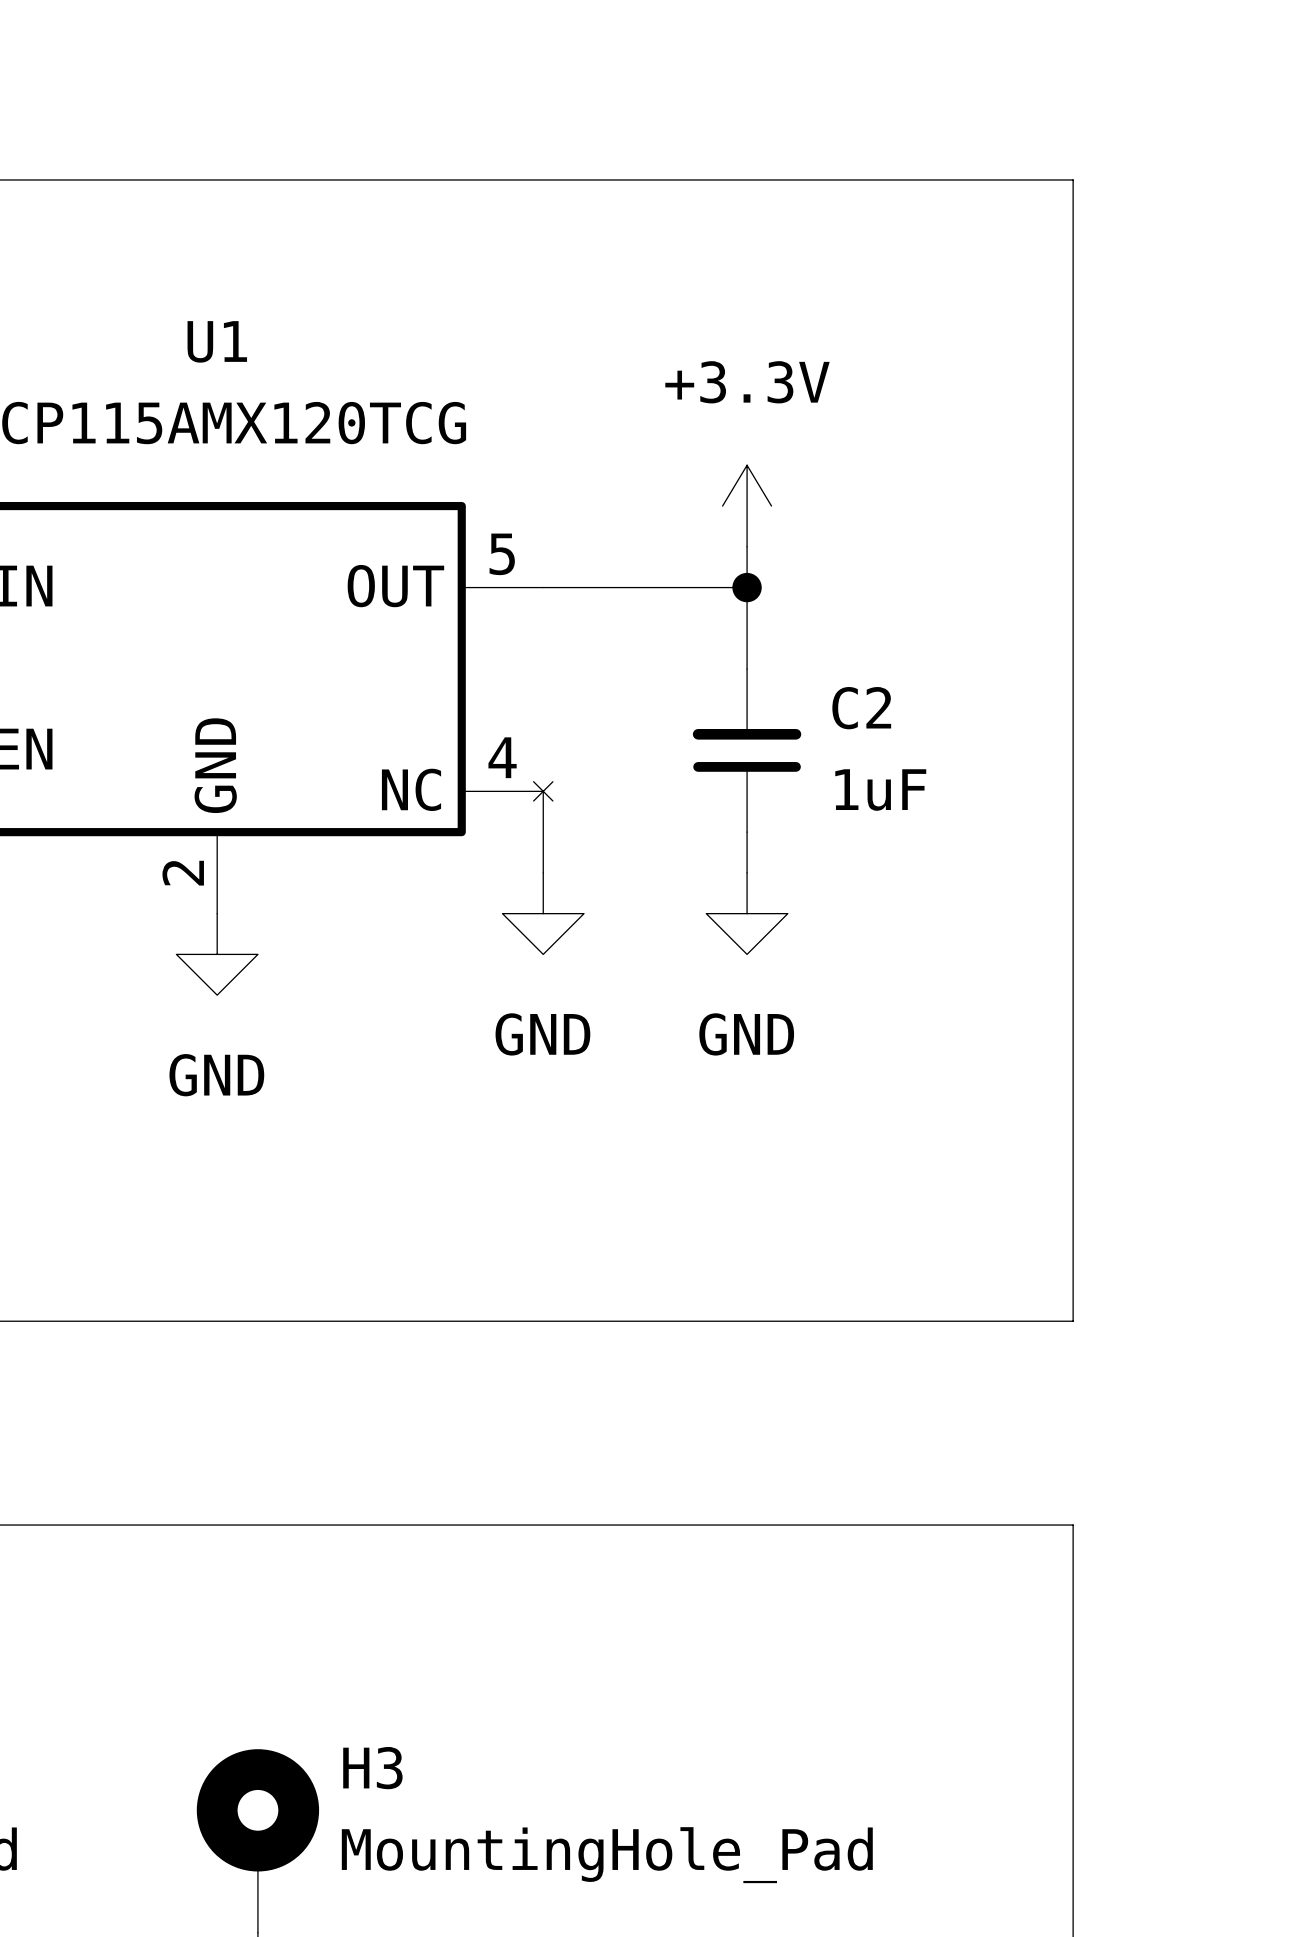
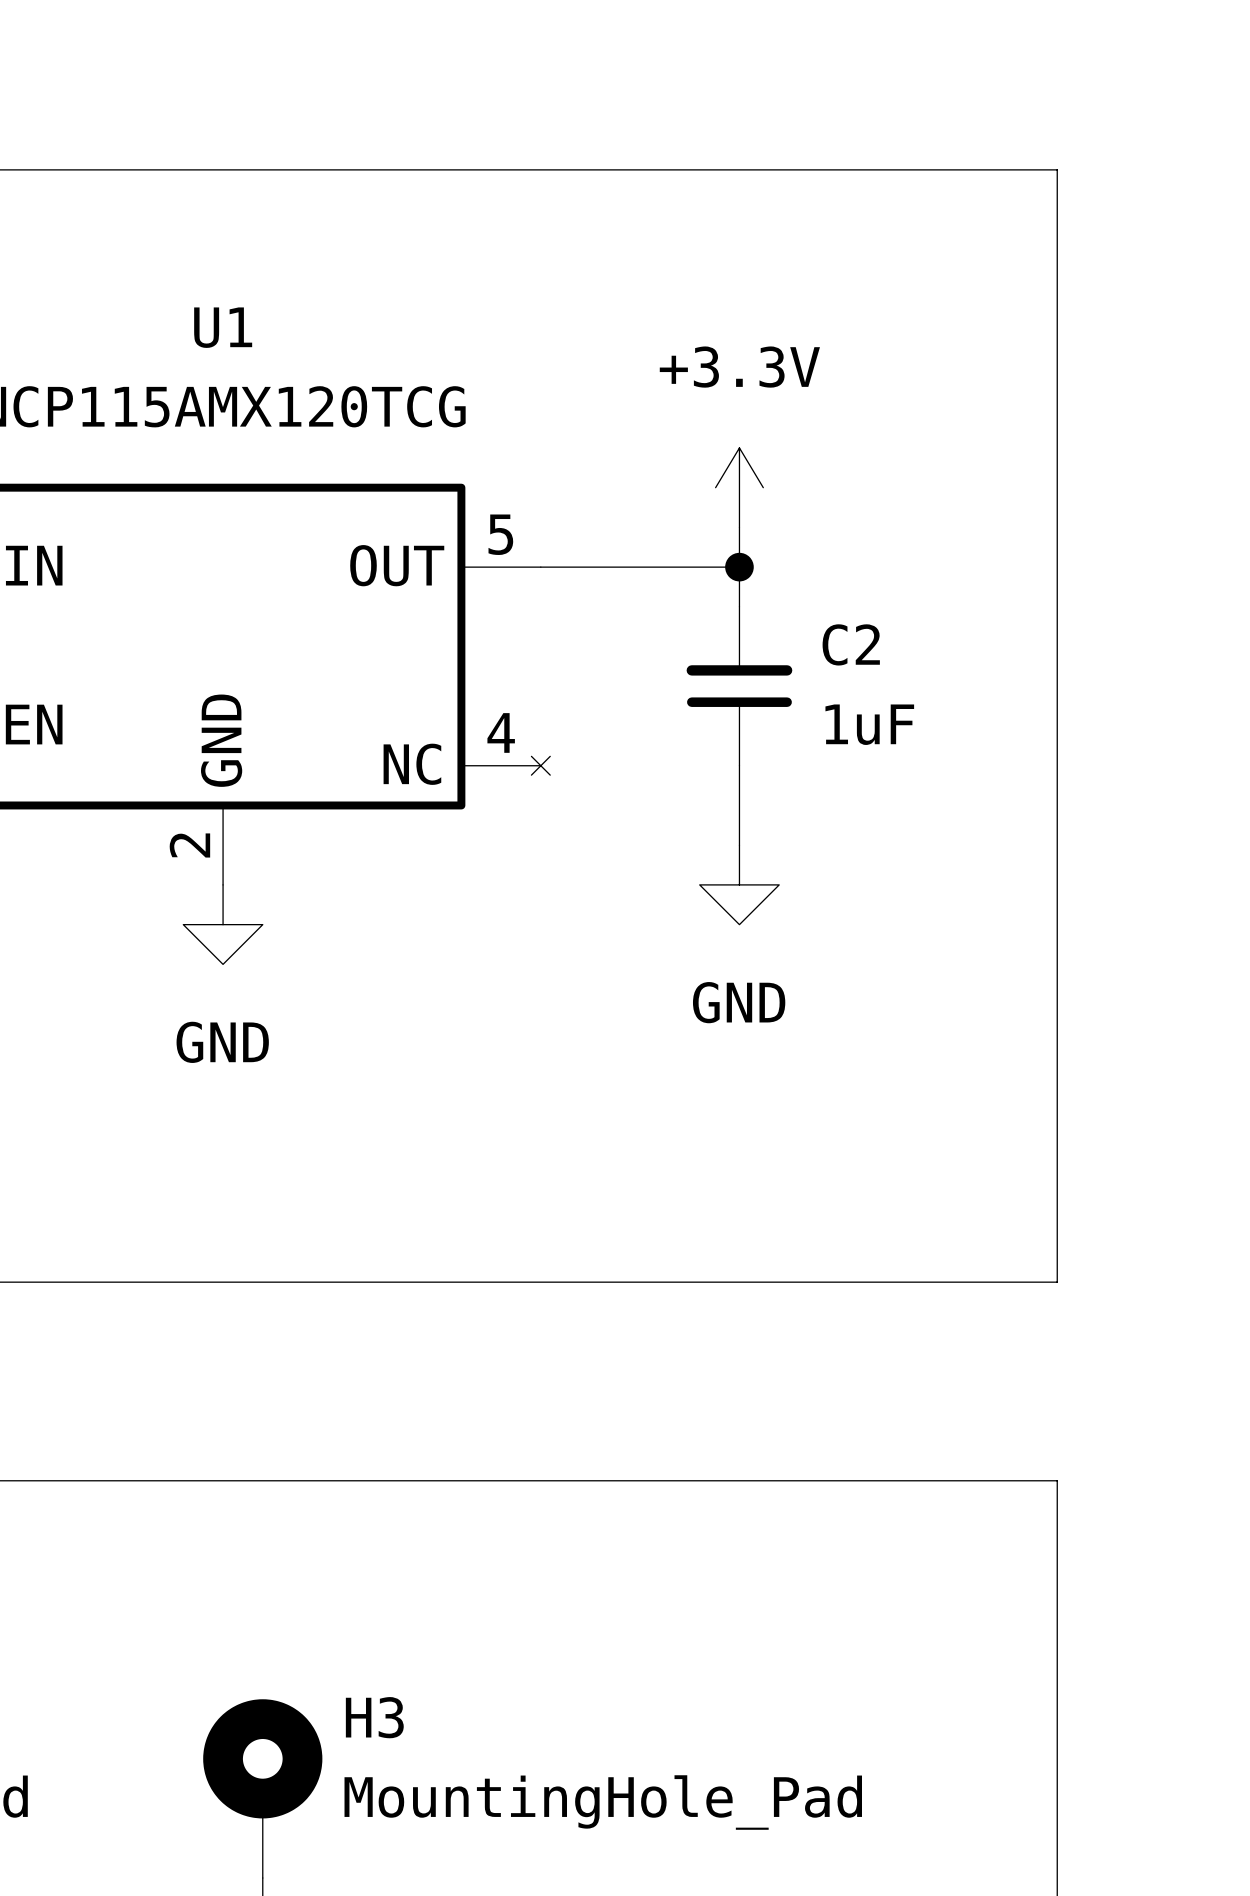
C2 position: (747, 750) -> (739, 686)
wire: (543, 791) (543, 872) -> none
power symbol: GND (543, 913) -> none

